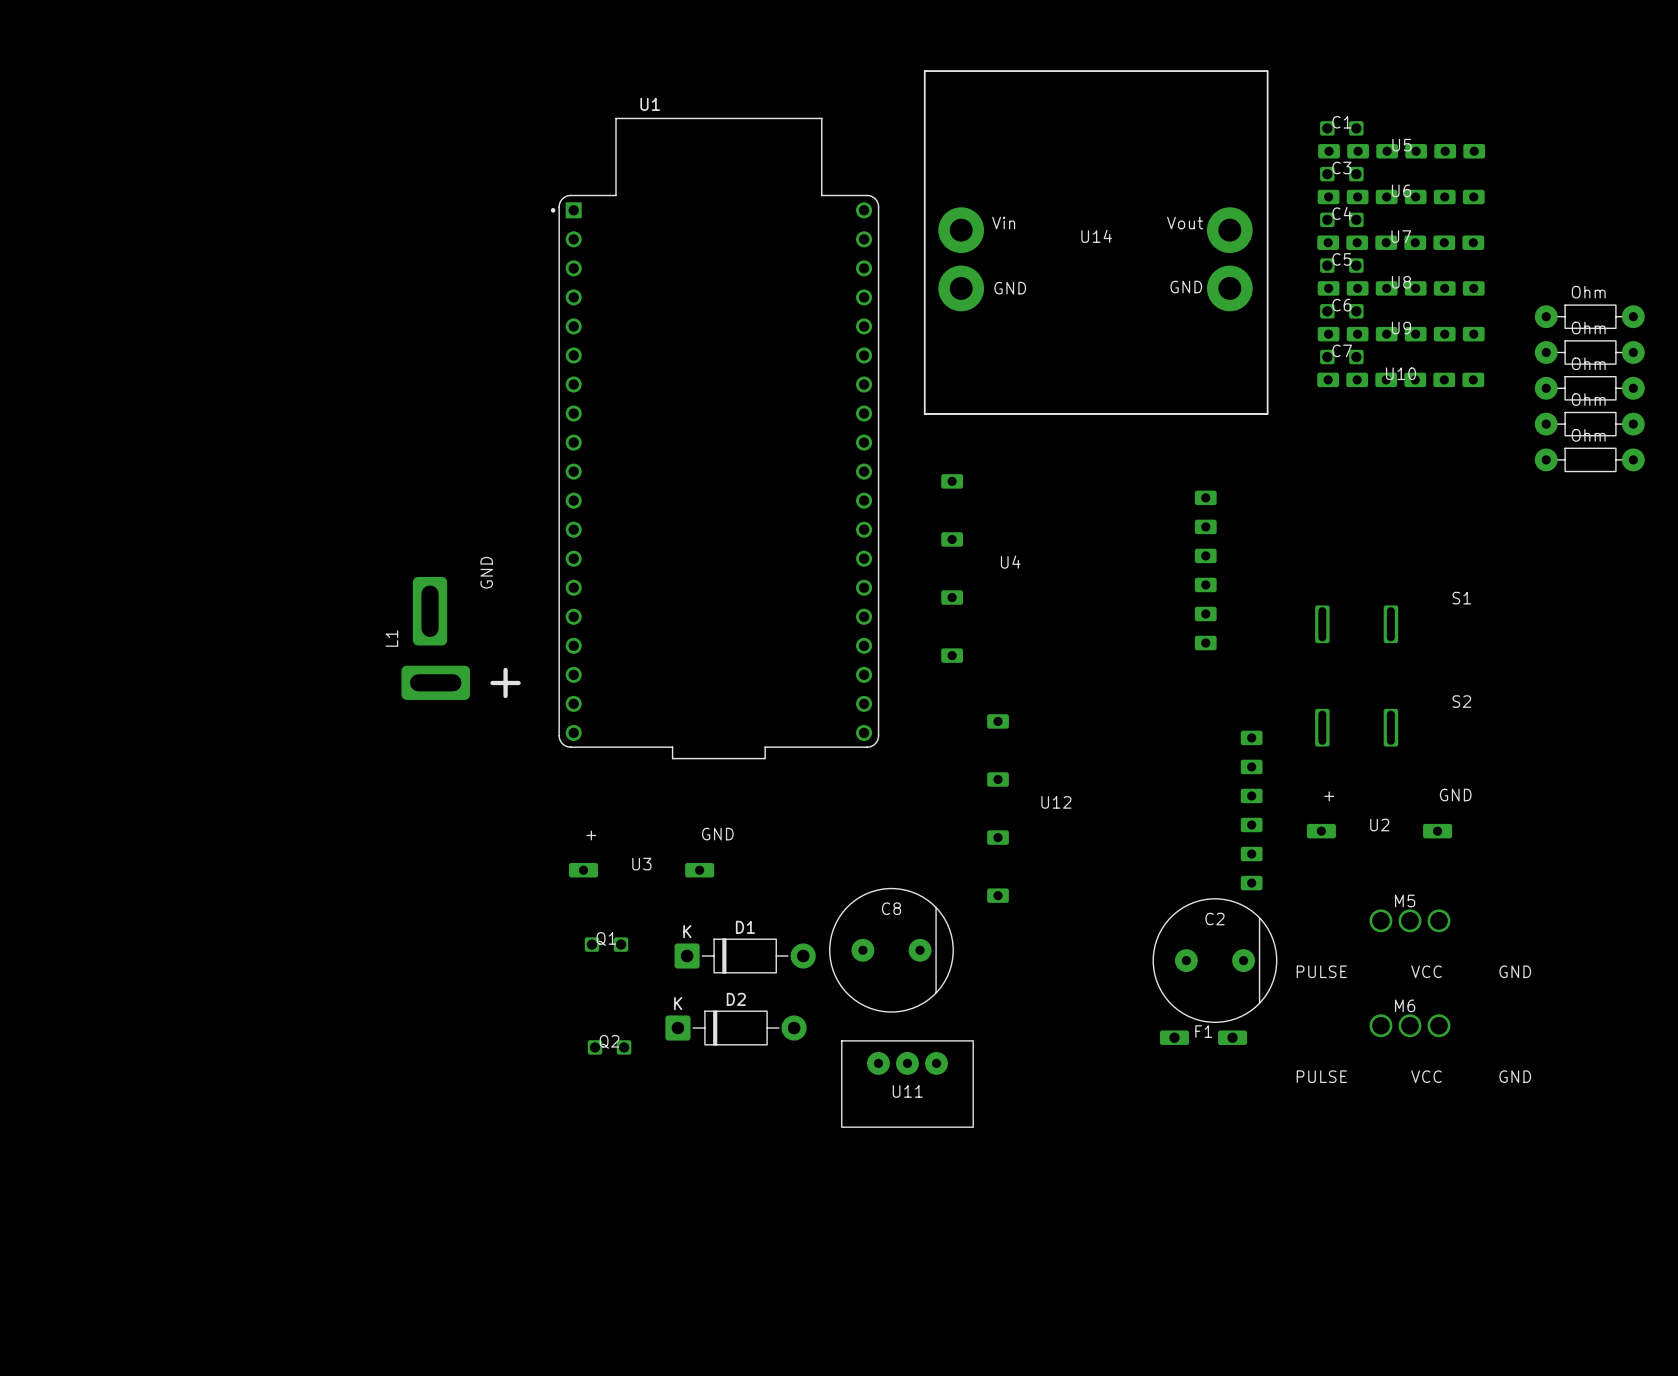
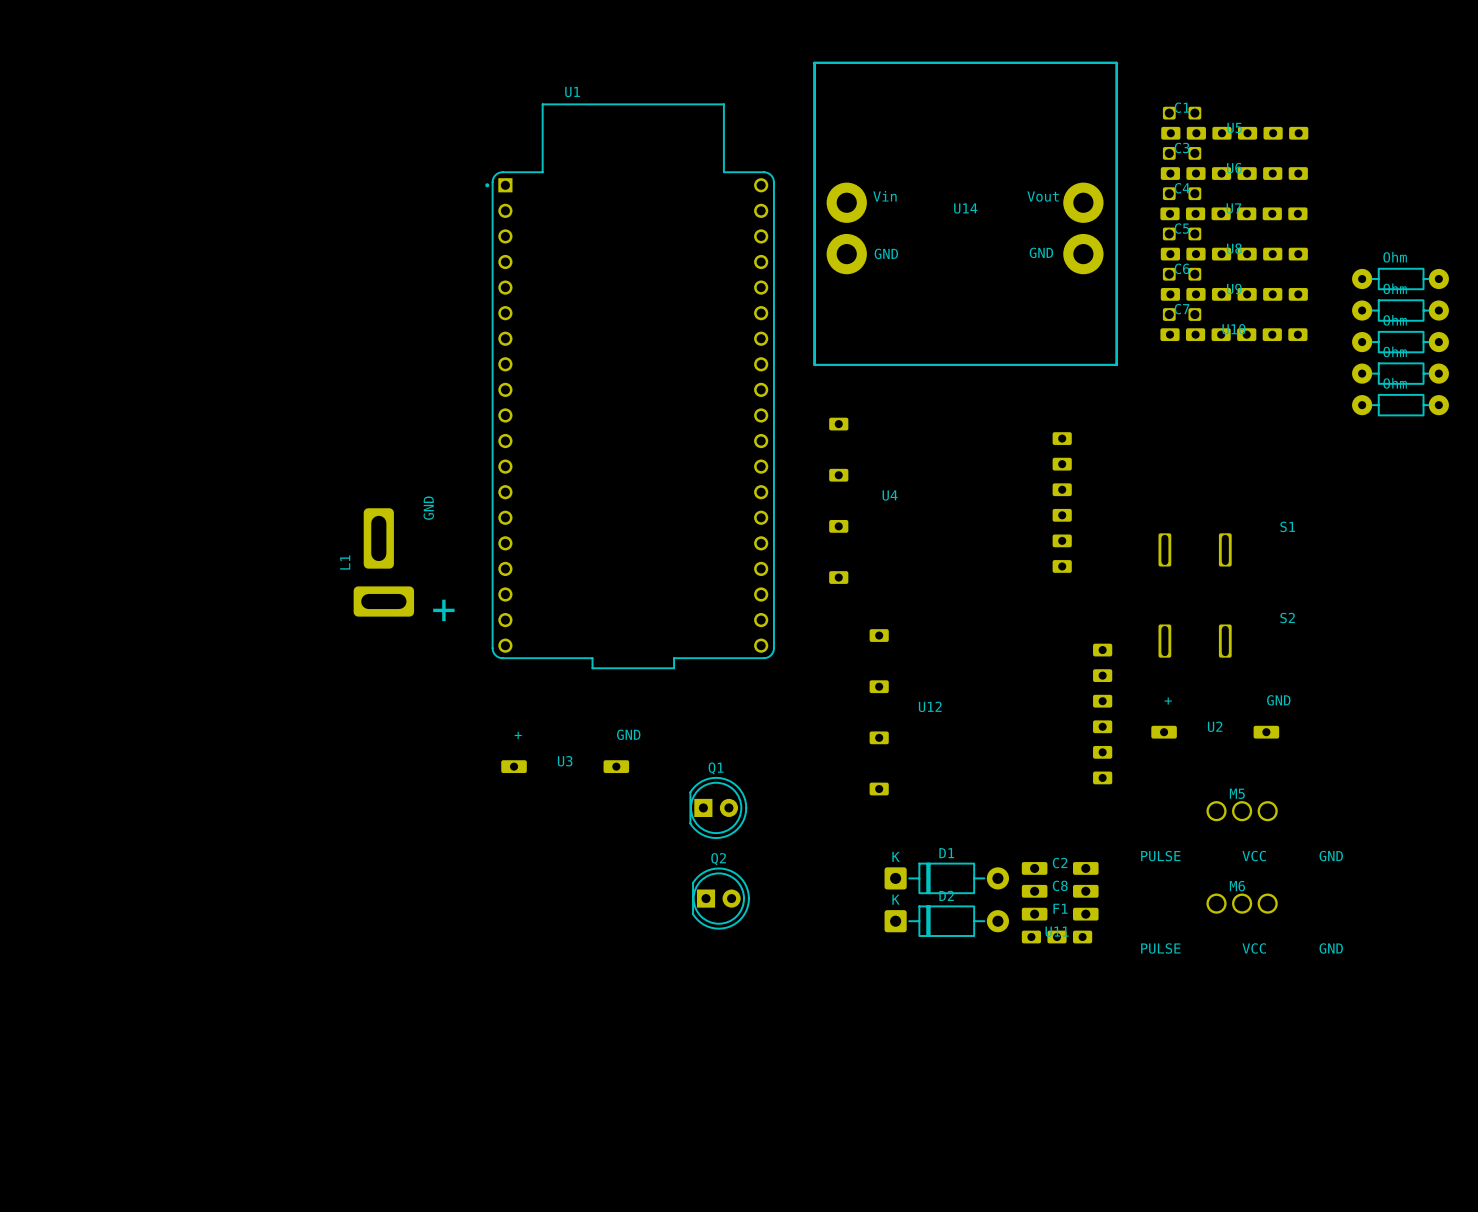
C8 footprint: [829, 887, 954, 1013] -> [1021, 884, 1099, 898]
C2 footprint: [1152, 898, 1278, 1023] -> [1021, 862, 1099, 875]
C8 name position: C8 (891, 908) -> C8 (1060, 885)
C2 name position: C2 (1214, 918) -> C2 (1060, 863)
Q1 footprint: [584, 937, 629, 952] -> [689, 777, 747, 839]
Q1 name position: Q1 (606, 938) -> Q1 (716, 768)
D1 position: (745, 956) -> (946, 878)
D2 position: (736, 1028) -> (946, 921)
Q2 footprint: [587, 1040, 632, 1055] -> [692, 867, 750, 930]
U11 footprint: [841, 1040, 974, 1128] -> [1021, 930, 1093, 944]
Q2 name position: Q2 (609, 1041) -> Q2 (718, 859)

